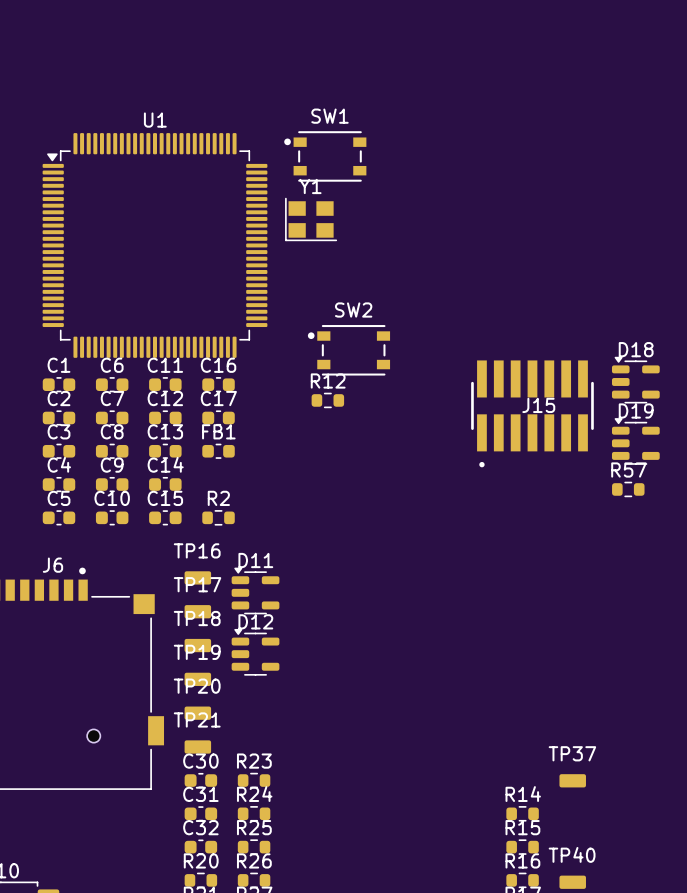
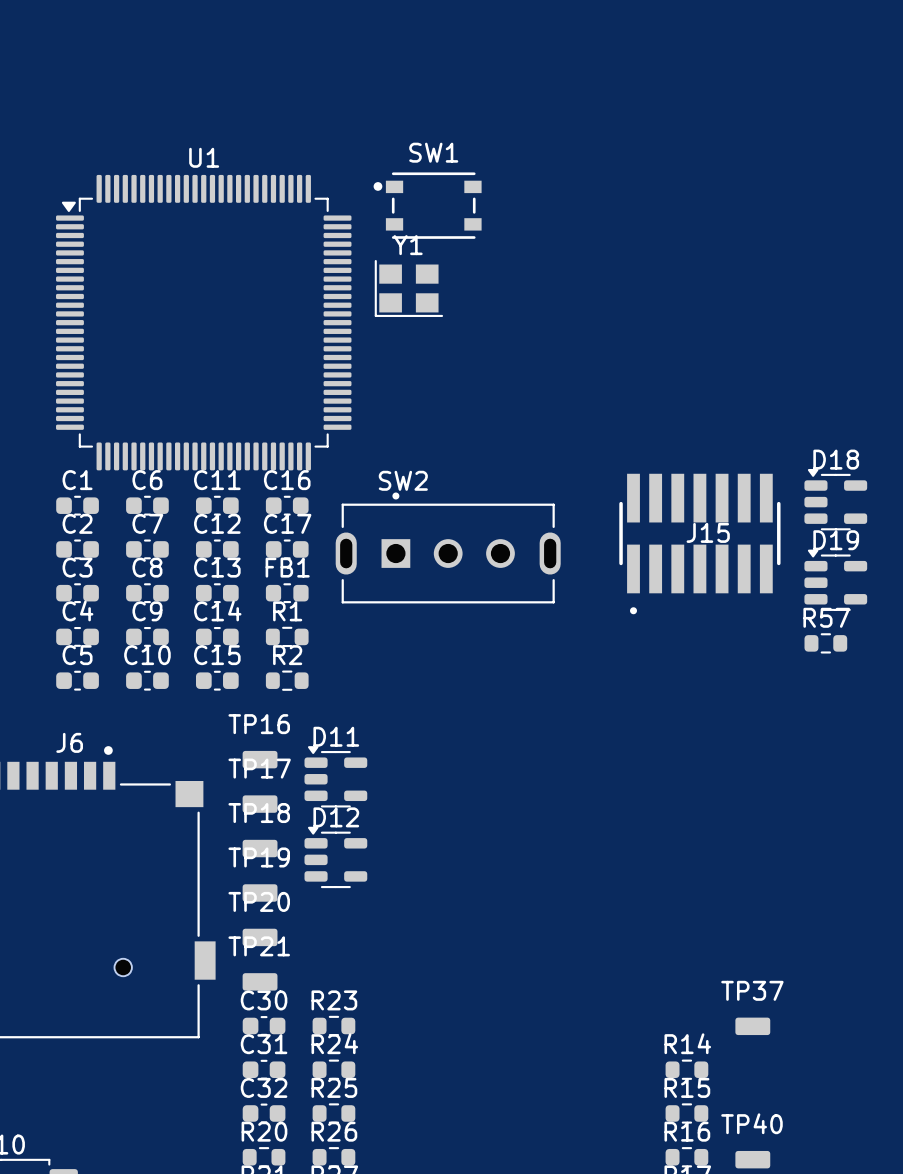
SW2 name position: SW2 (353, 310) -> SW2 (403, 480)
SW2 footprint: [307, 325, 391, 376] -> [335, 492, 561, 604]
R12: (327, 400) -> none
R1: none -> (287, 636)

